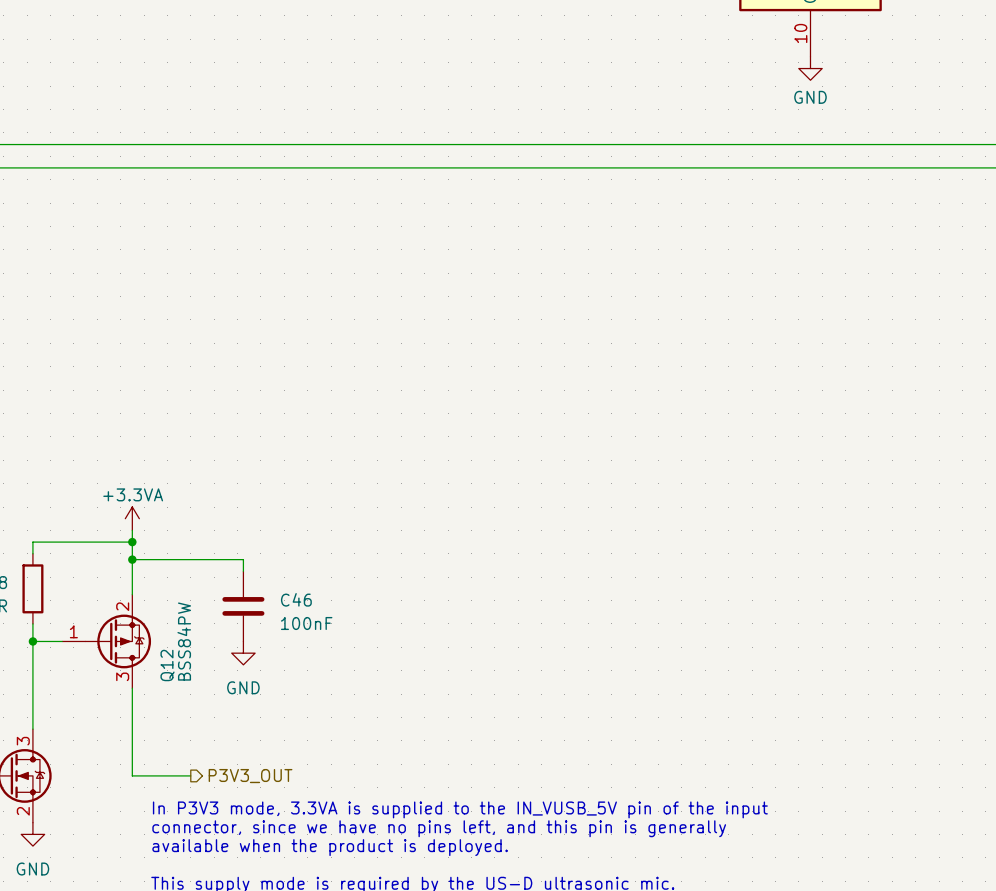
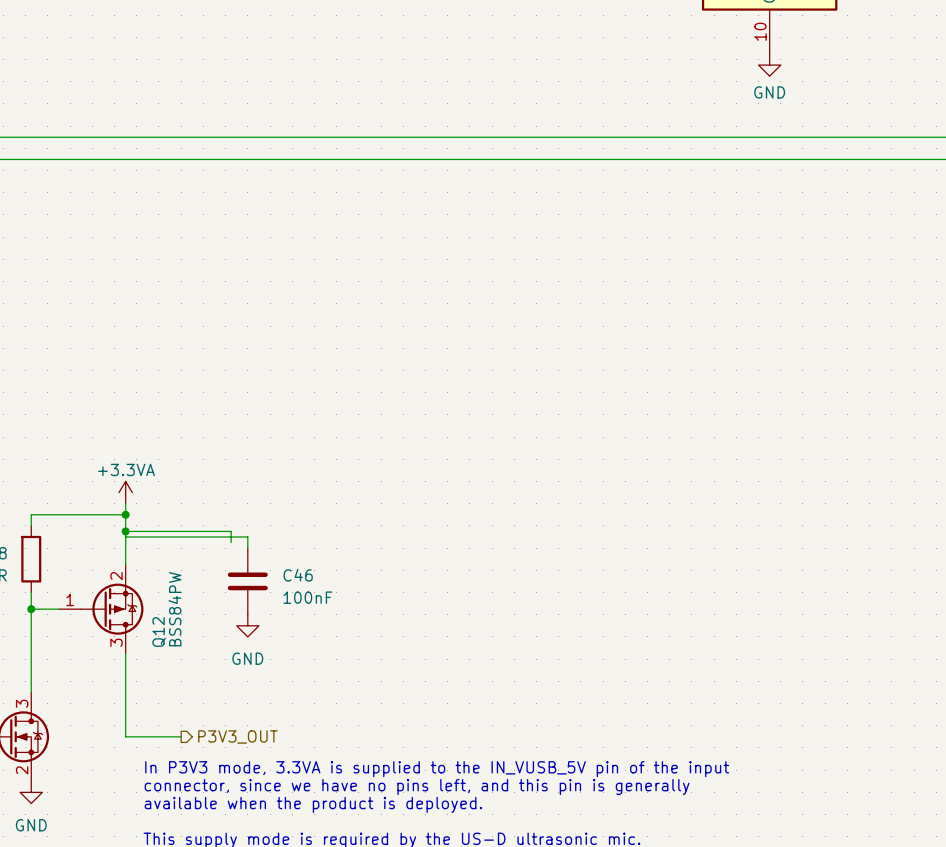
wire: none -> (125, 536) (247, 536) (247, 548)
C46 position: (243, 606) -> (247, 581)
power symbol position: GND (243, 653) -> GND (247, 625)

